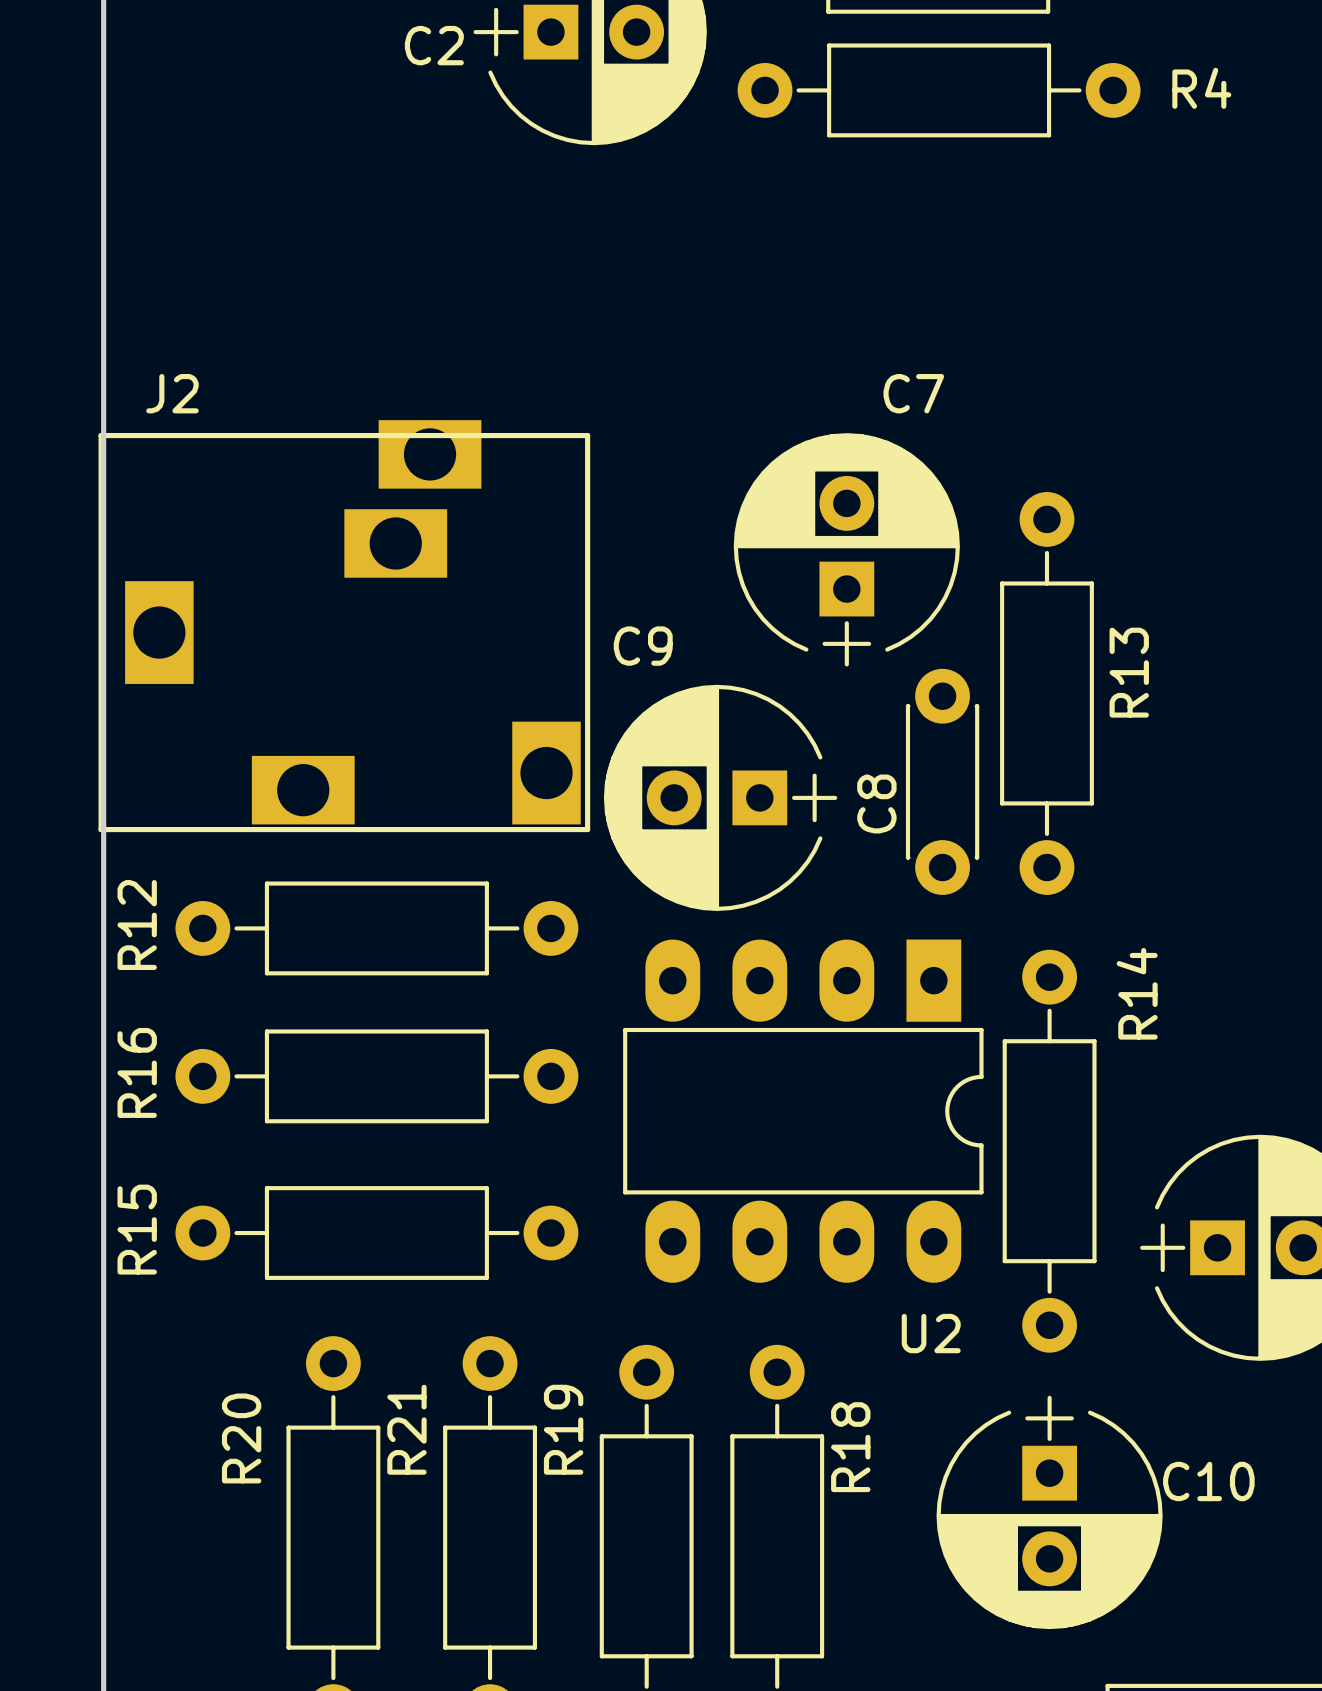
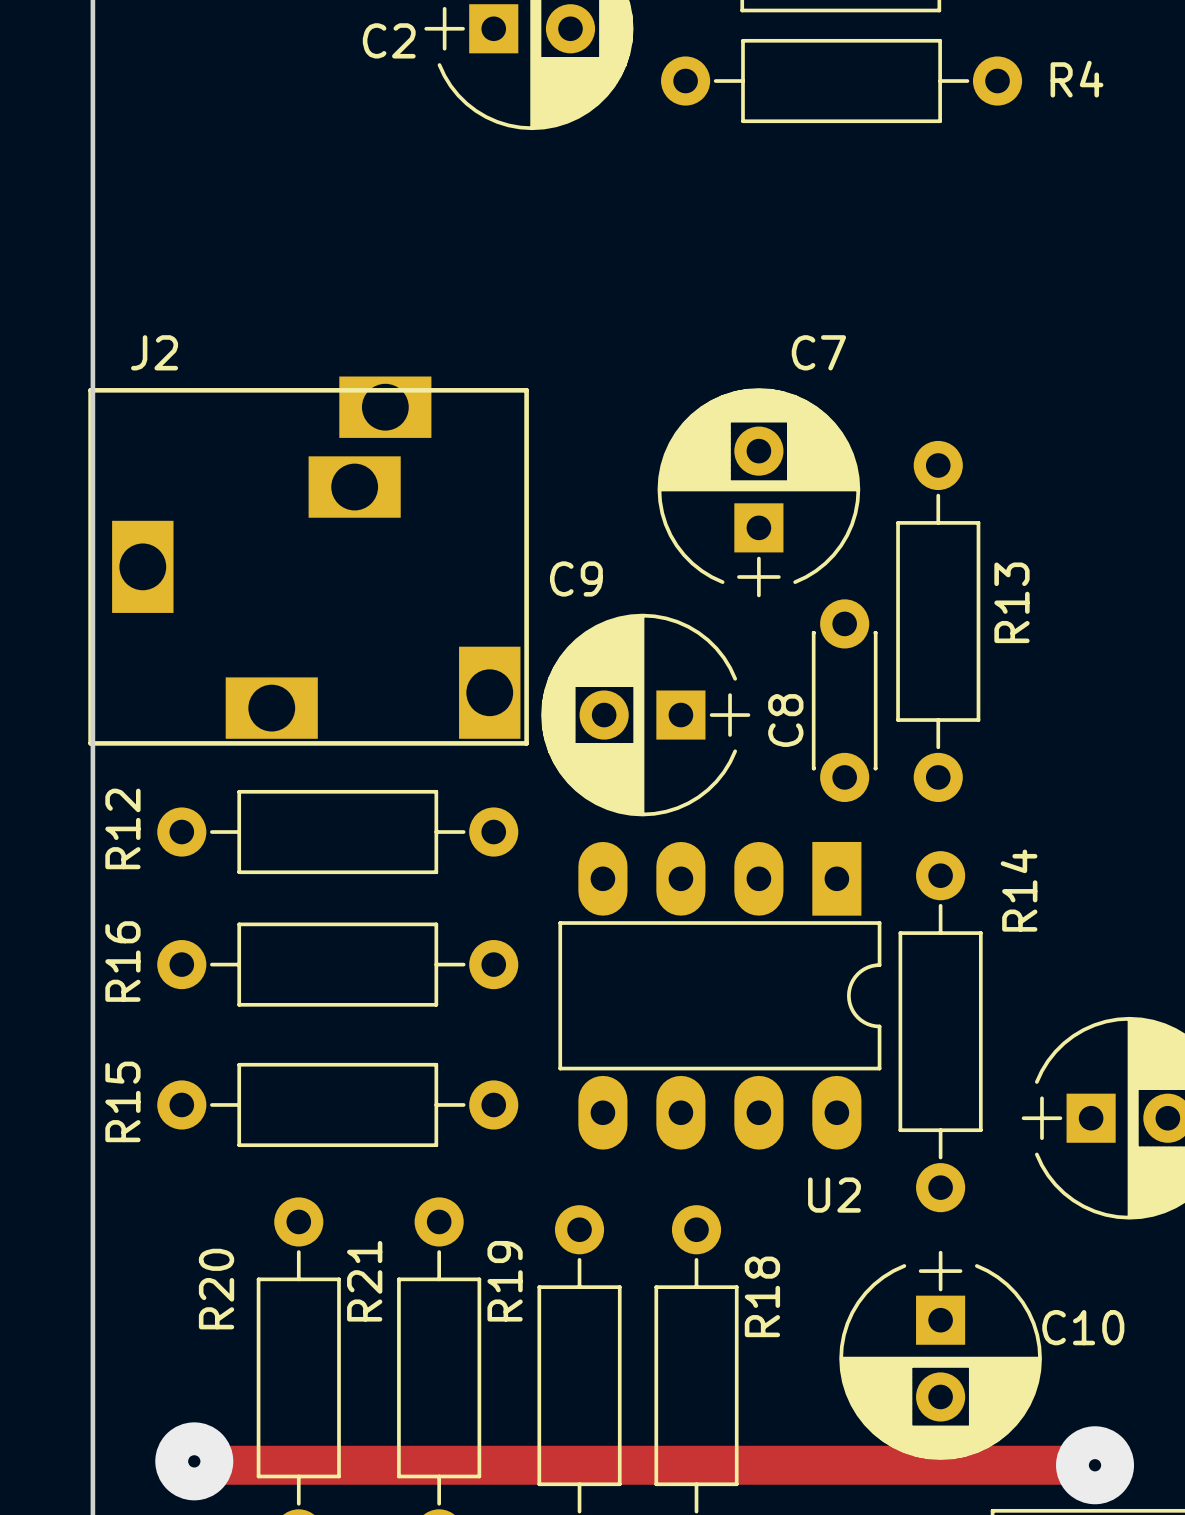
track: none -> (194, 1461) (198, 1465) (1095, 1465)
via: none -> (194, 1461)
via: none -> (1095, 1465)

